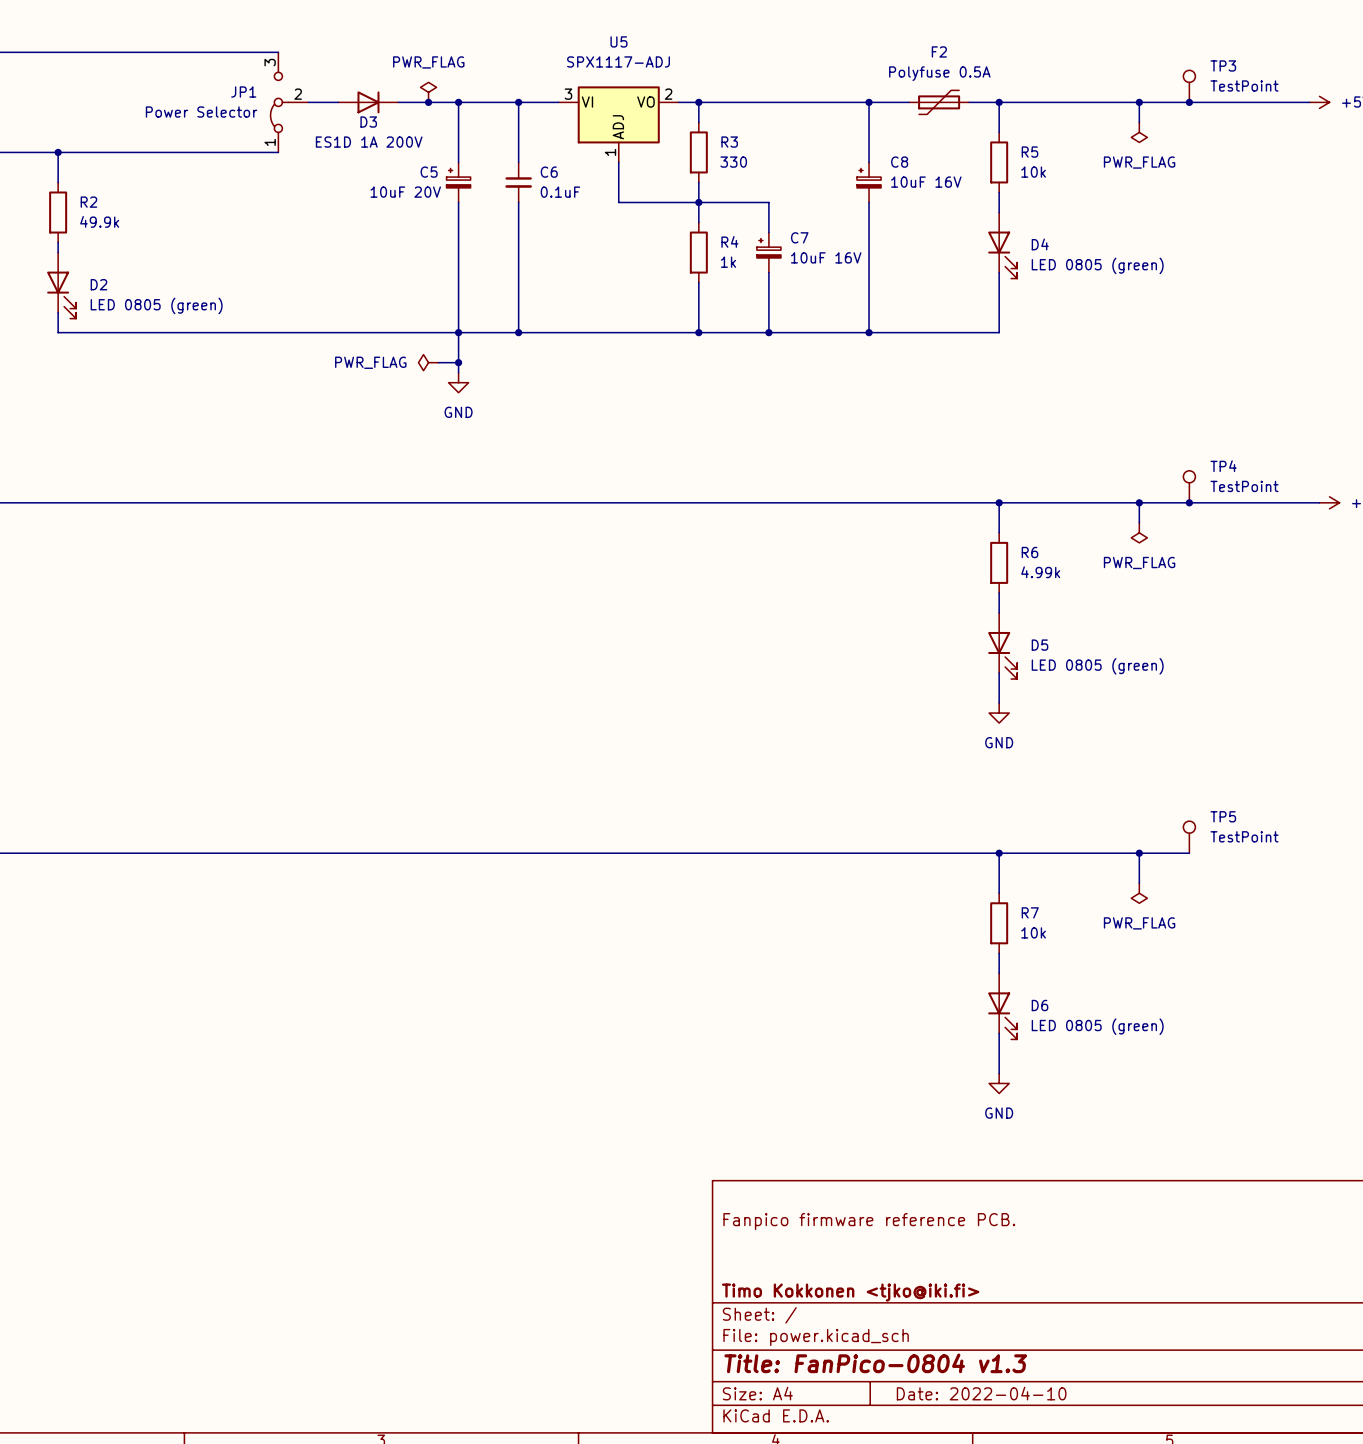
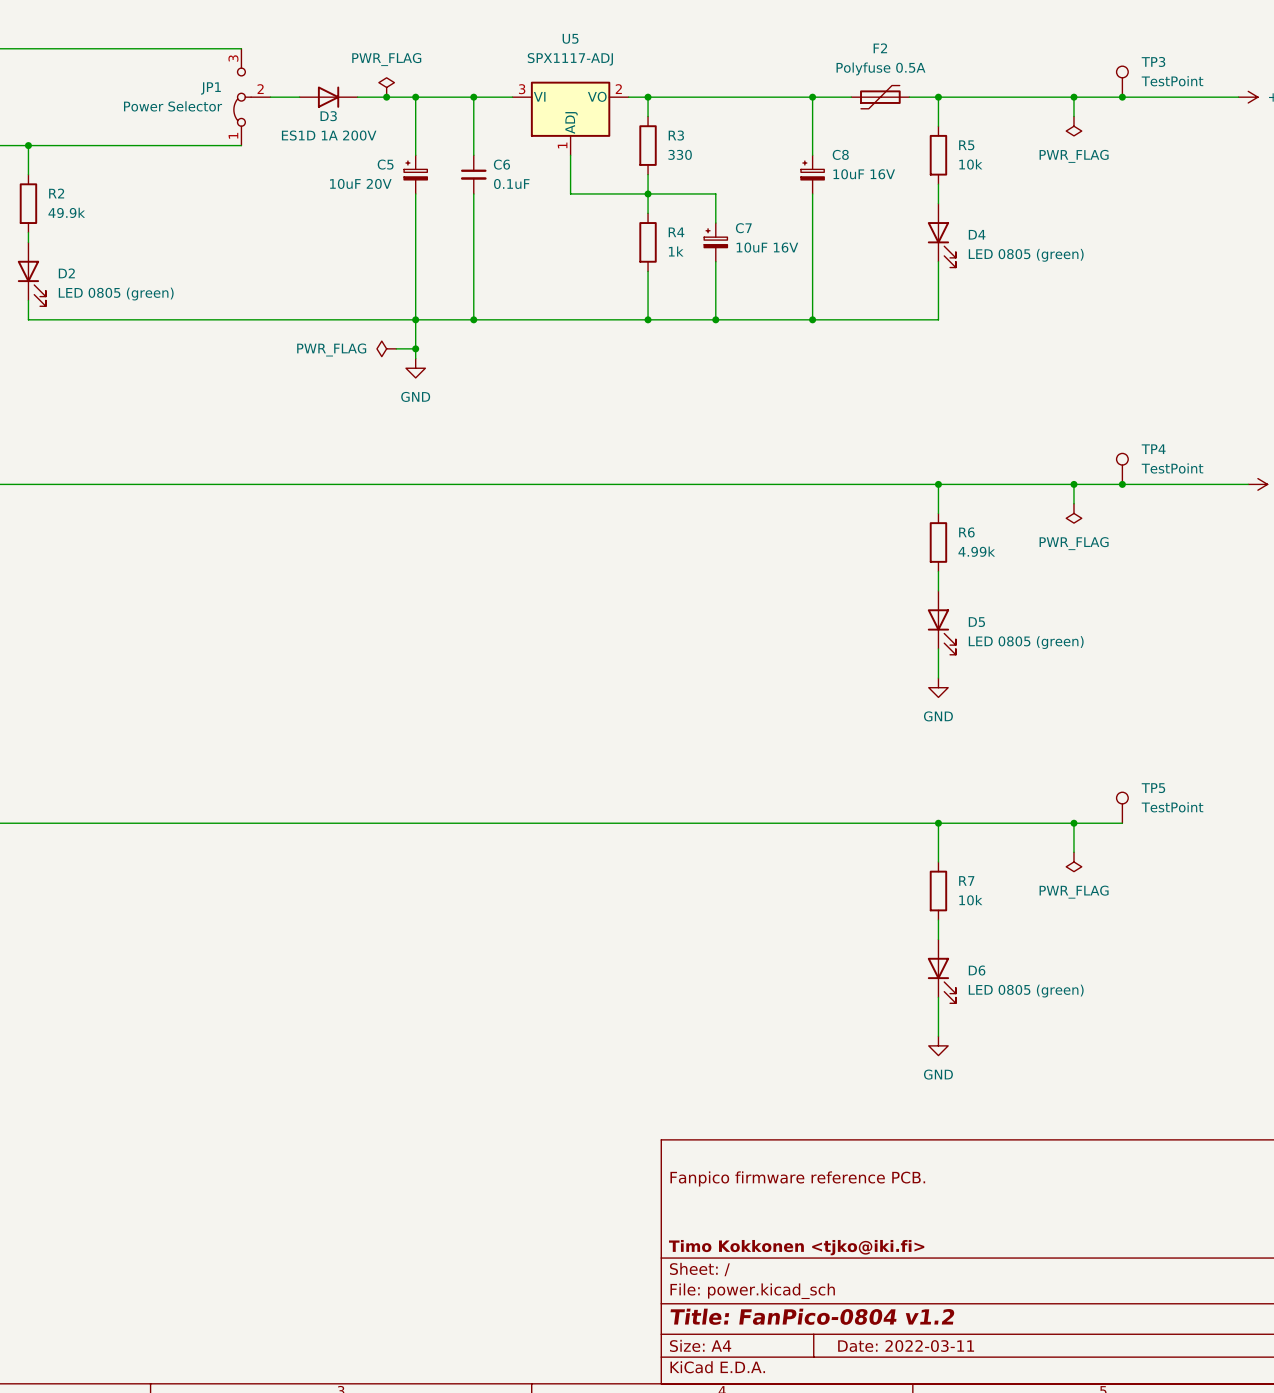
title block: Title: FanPico-0804 v1.3 (875, 1363) -> Title: FanPico-0804 v1.2 (812, 1316)
title block: Date: 2022-04-10 (981, 1393) -> Date: 2022-03-11 (906, 1346)

